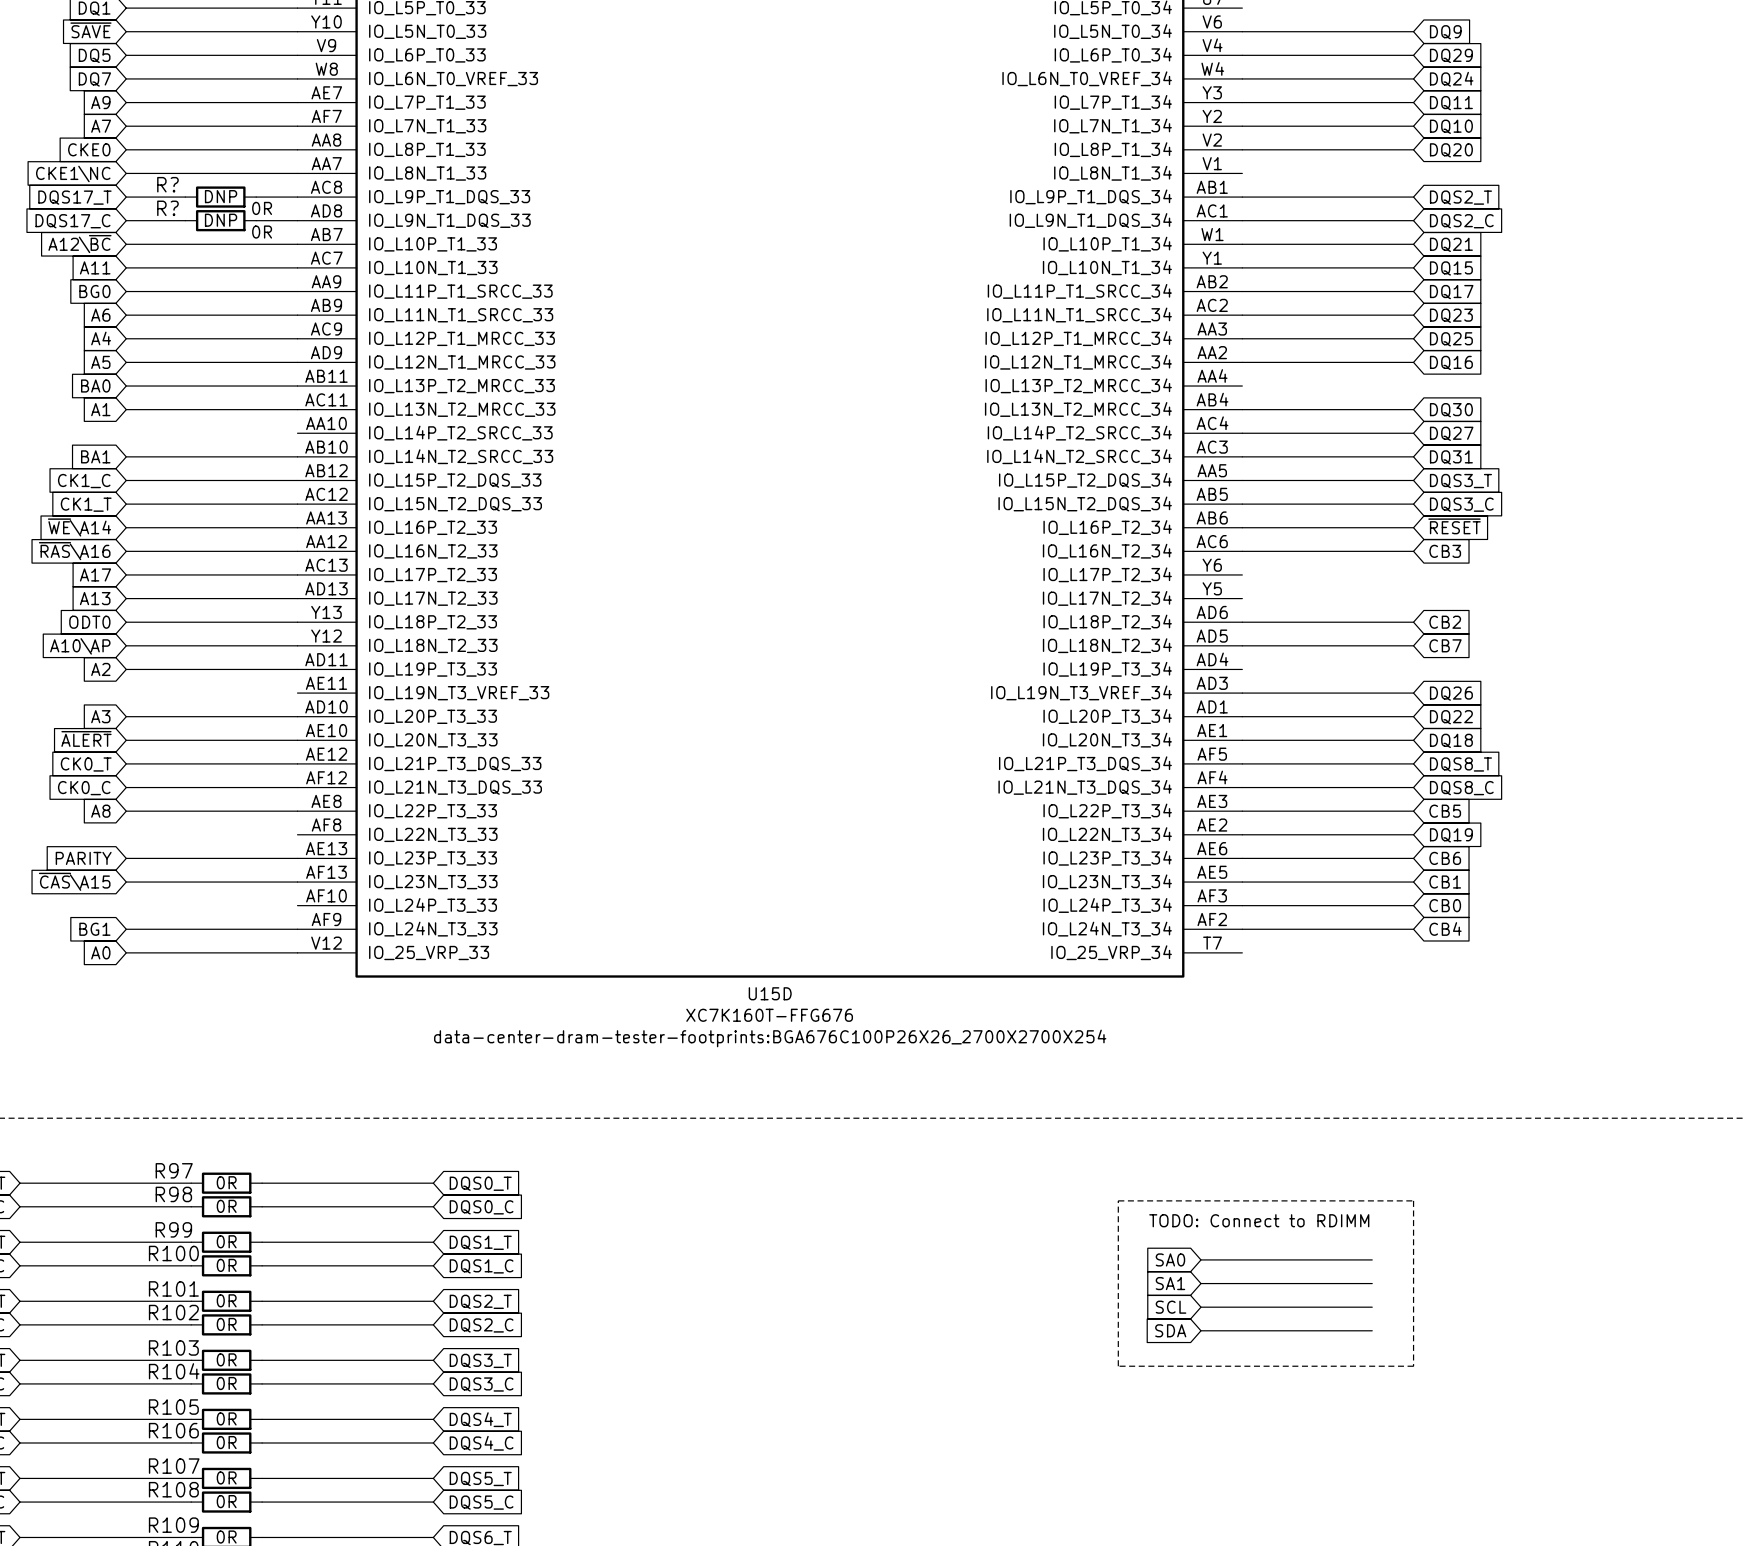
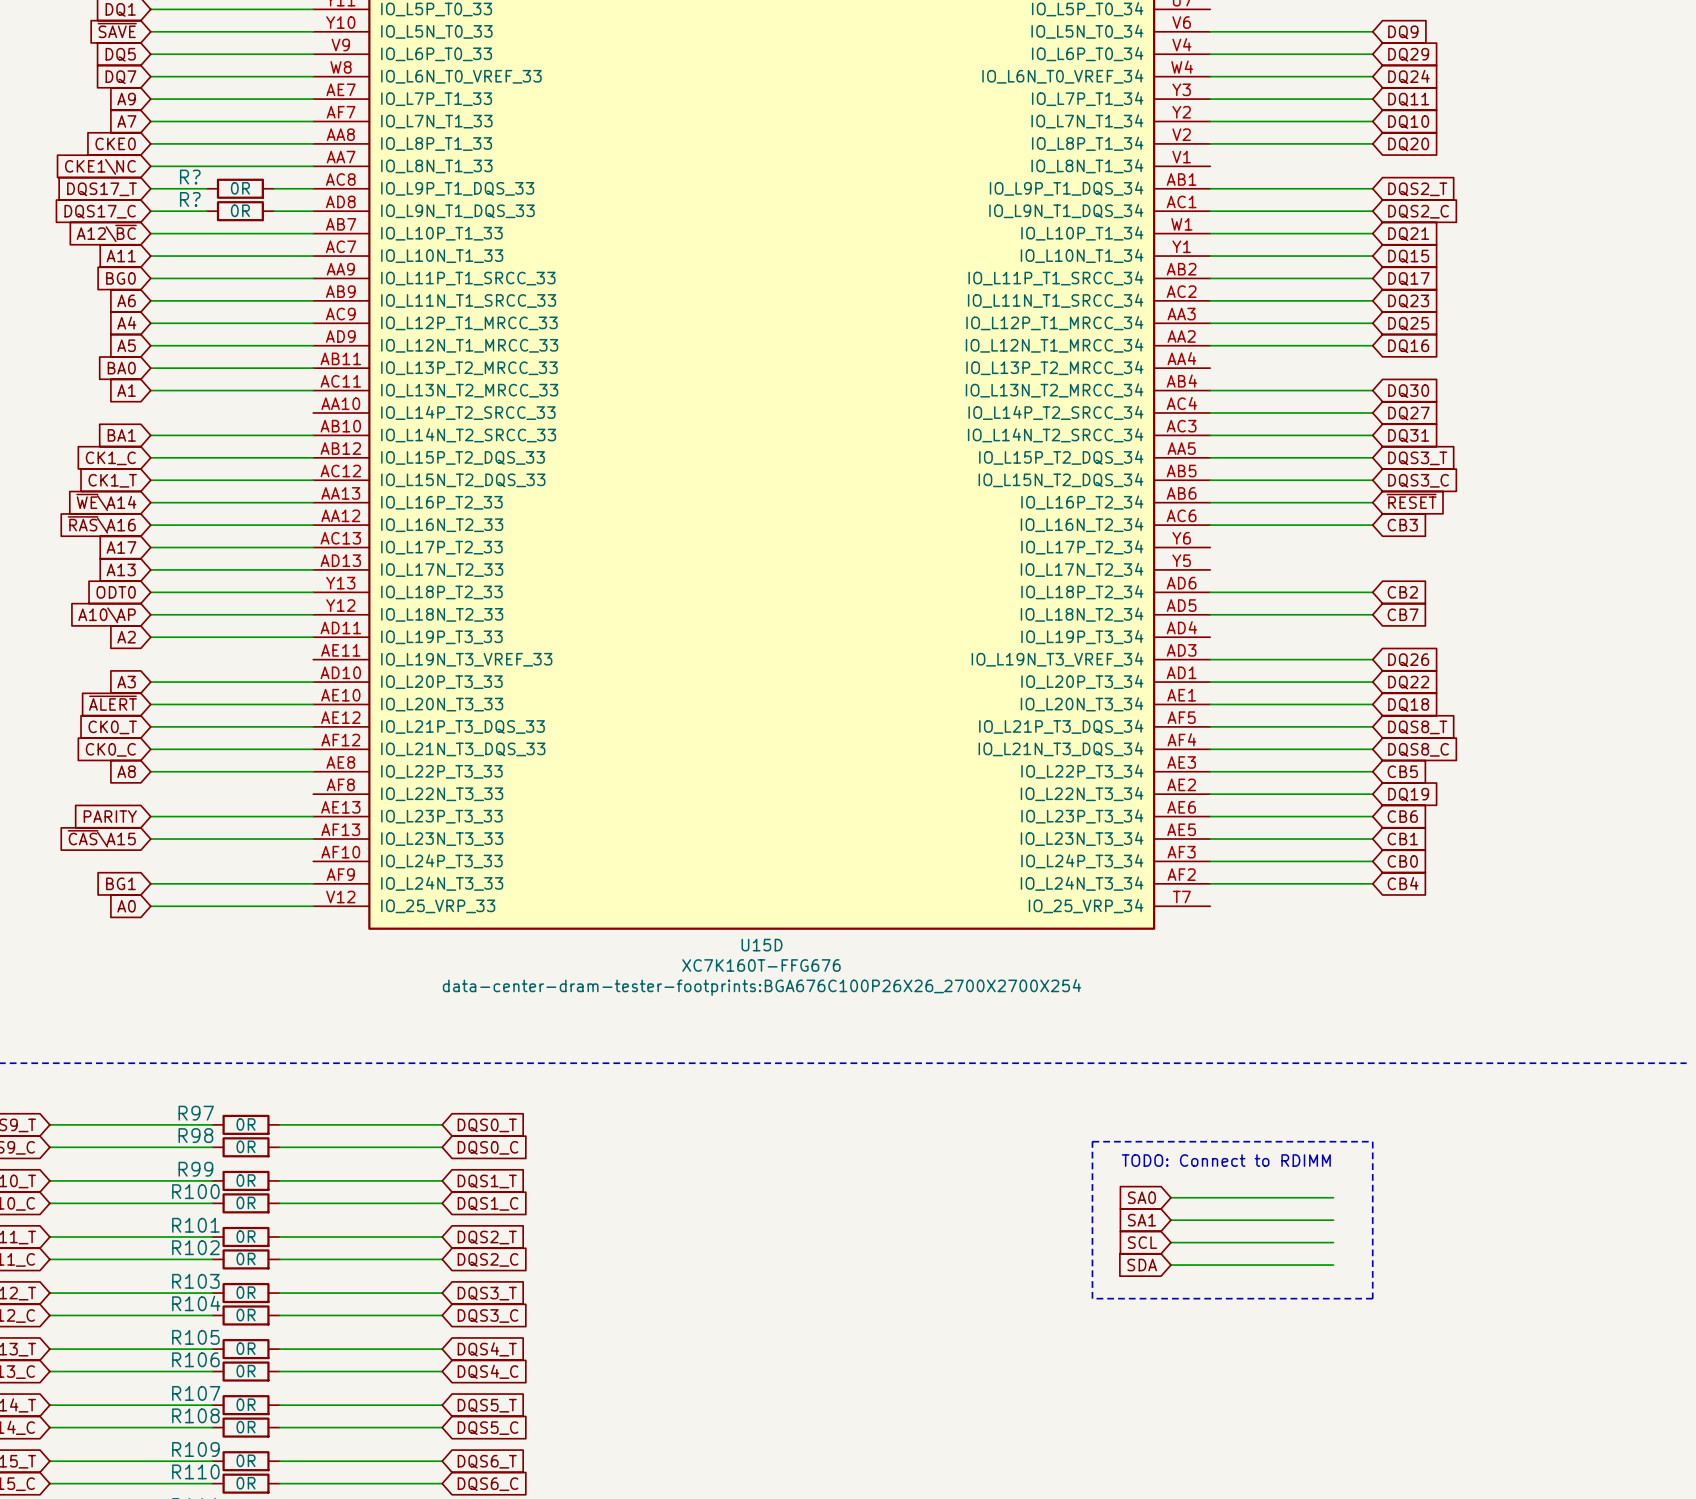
R? text: DNP (221, 196) -> none
R? text position: 0R (262, 208) -> 0R (240, 188)
R? text: DNP (221, 220) -> none
R? text position: 0R (262, 232) -> 0R (240, 210)

